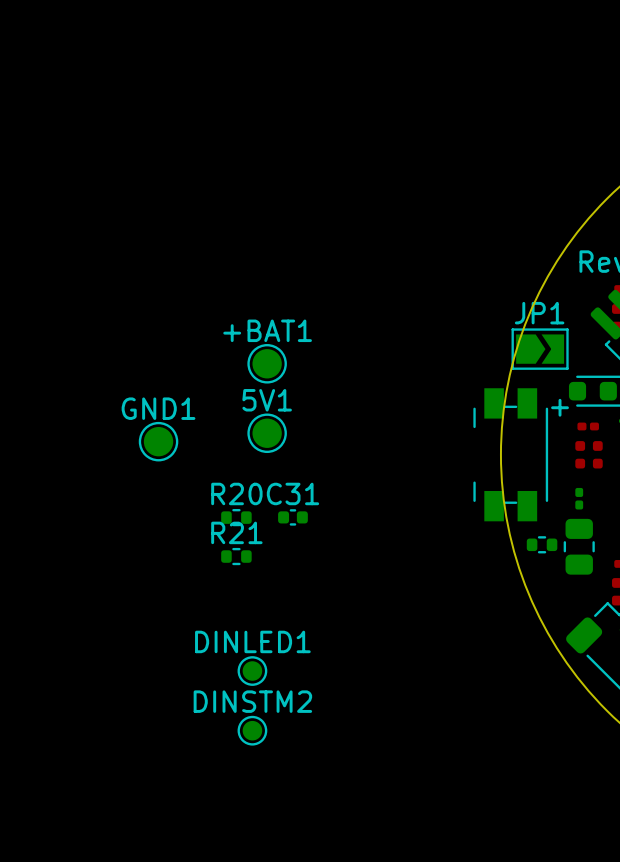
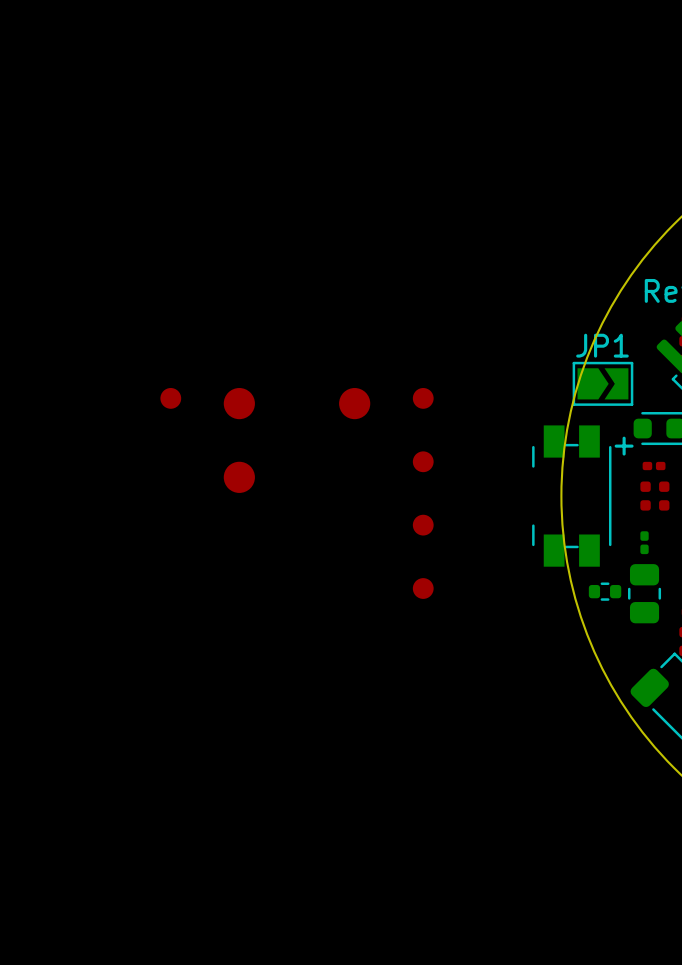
part: none -> (170, 398)
part: none -> (423, 398)
+BAT1 side: bottom (267, 363) -> top (239, 403)
5V1 side: bottom (267, 433) -> top (239, 477)
GND1 side: bottom (158, 441) -> top (354, 403)
part: none -> (423, 525)
R20: (236, 517) -> none
C31: (292, 517) -> none
part: none -> (423, 588)
R21: (236, 556) -> none
DINLED1 side: bottom (252, 671) -> top (423, 461)
DINSTM2: (252, 730) -> none

